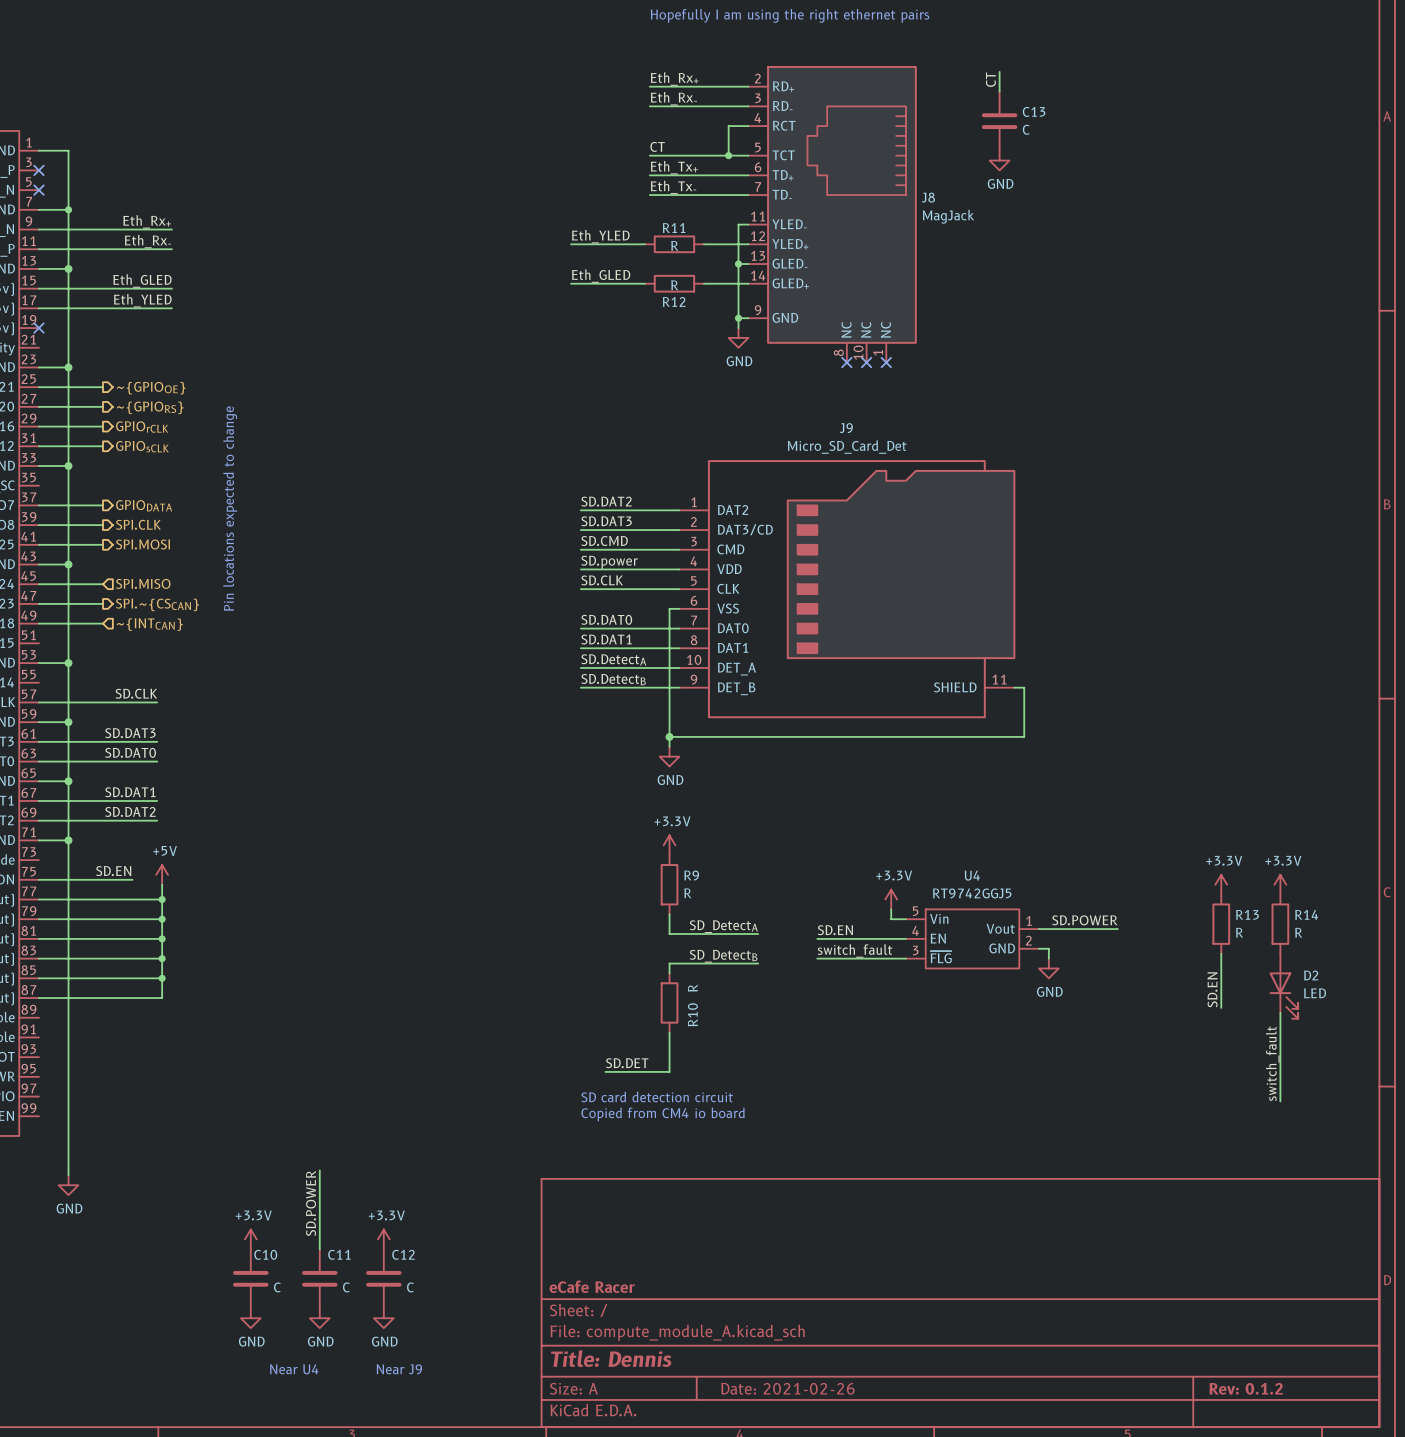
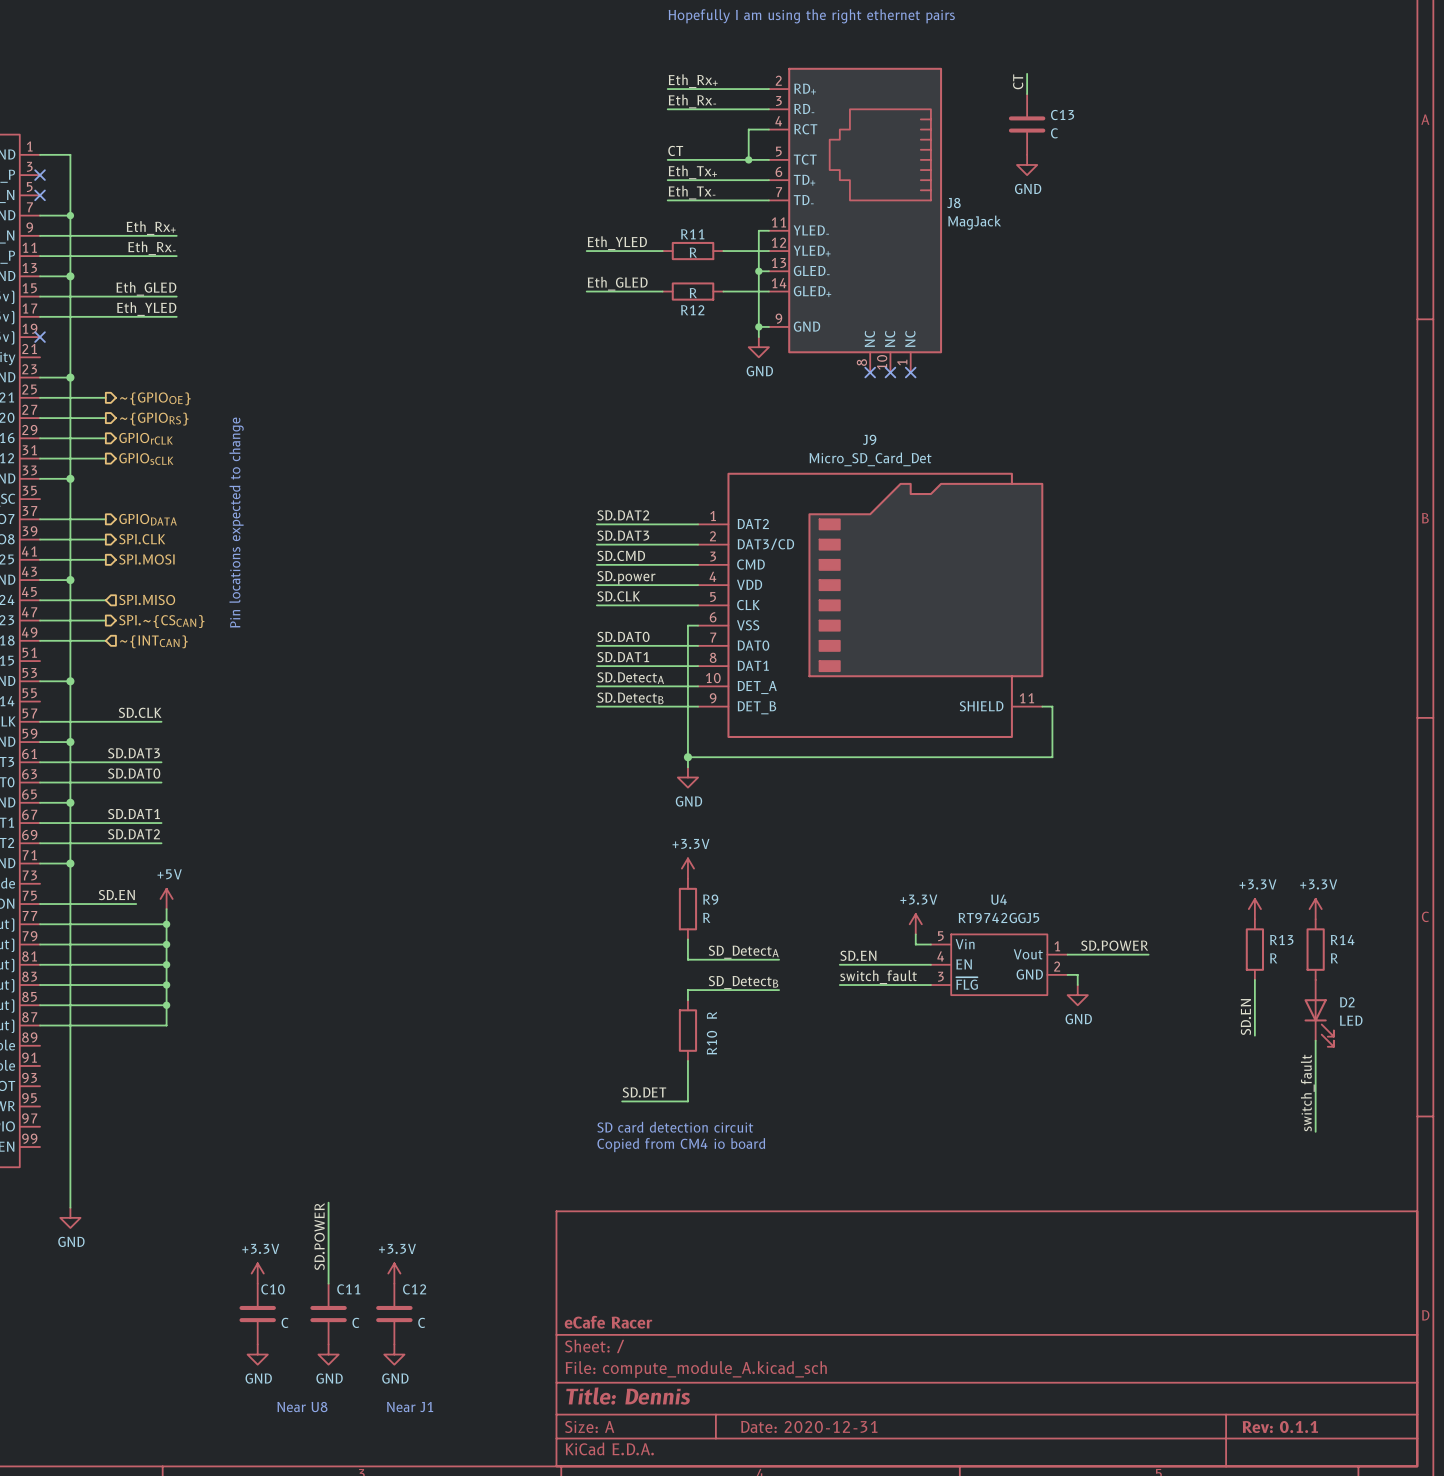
text: Near U4 (294, 1369) -> Near U8 (302, 1407)
text: Near J9 (399, 1369) -> Near J1 (410, 1407)
title block: Date: 2021-02-26 (787, 1388) -> Date: 2020-12-31 (809, 1426)
title block: Rev: 0.1.2 (1246, 1388) -> Rev: 0.1.1 (1280, 1427)

